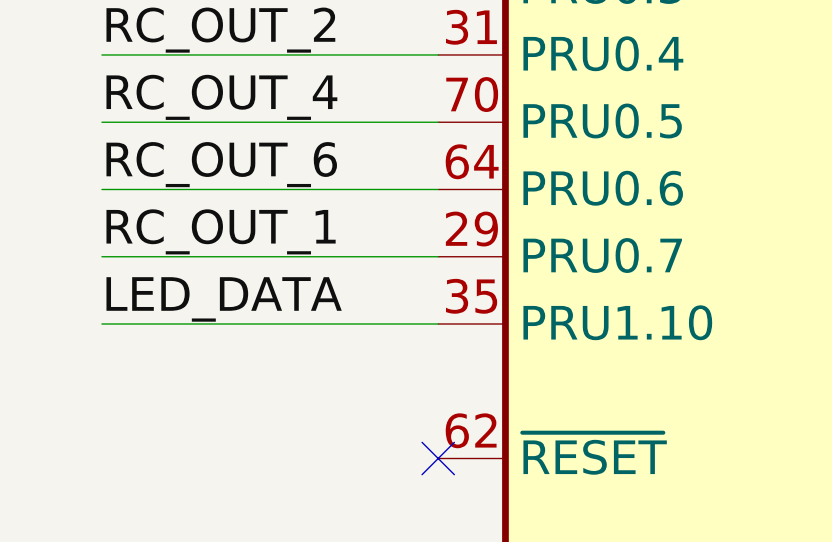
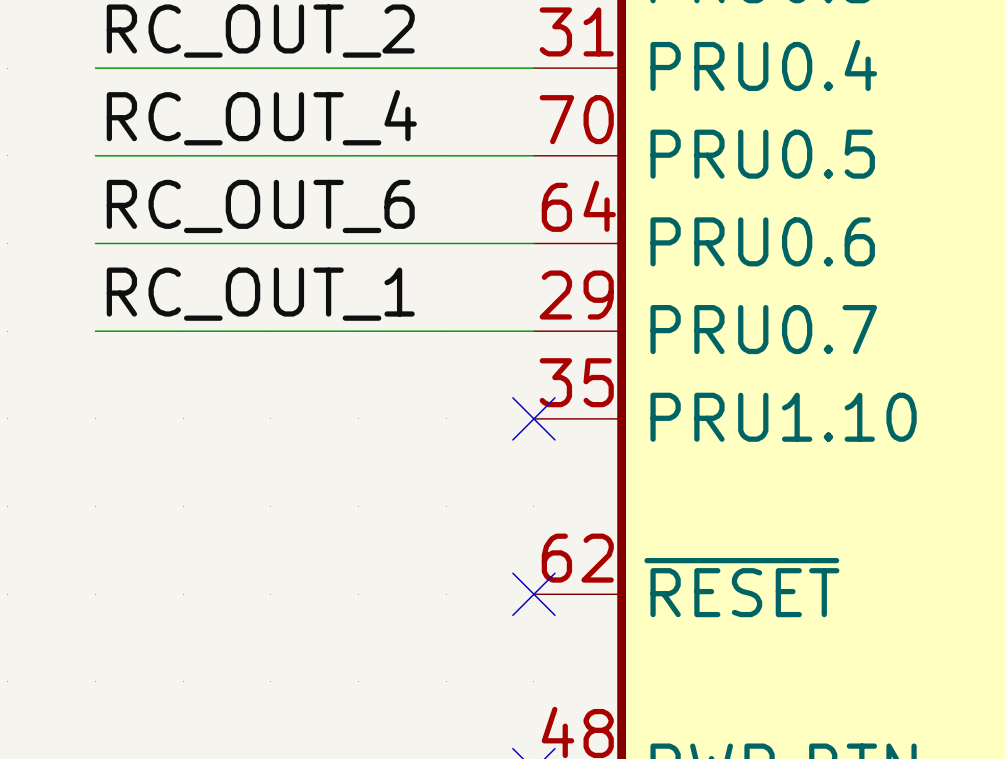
label: LED_DATA (224, 299) -> none
wire: (101, 324) (438, 324) -> none
no-connect mark: none -> (533, 418)

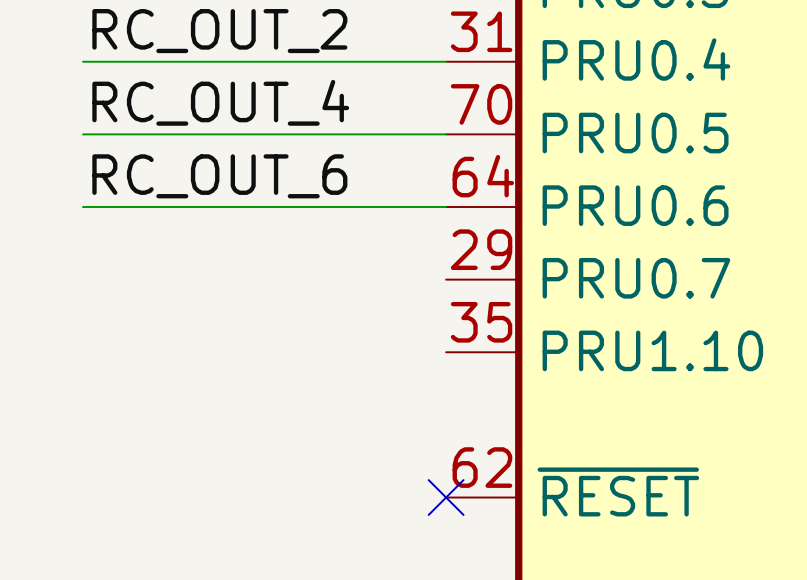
label: RC_OUT_1 (260, 294) -> none
wire: (95, 331) (533, 331) -> none
no-connect mark: (533, 418) -> none

